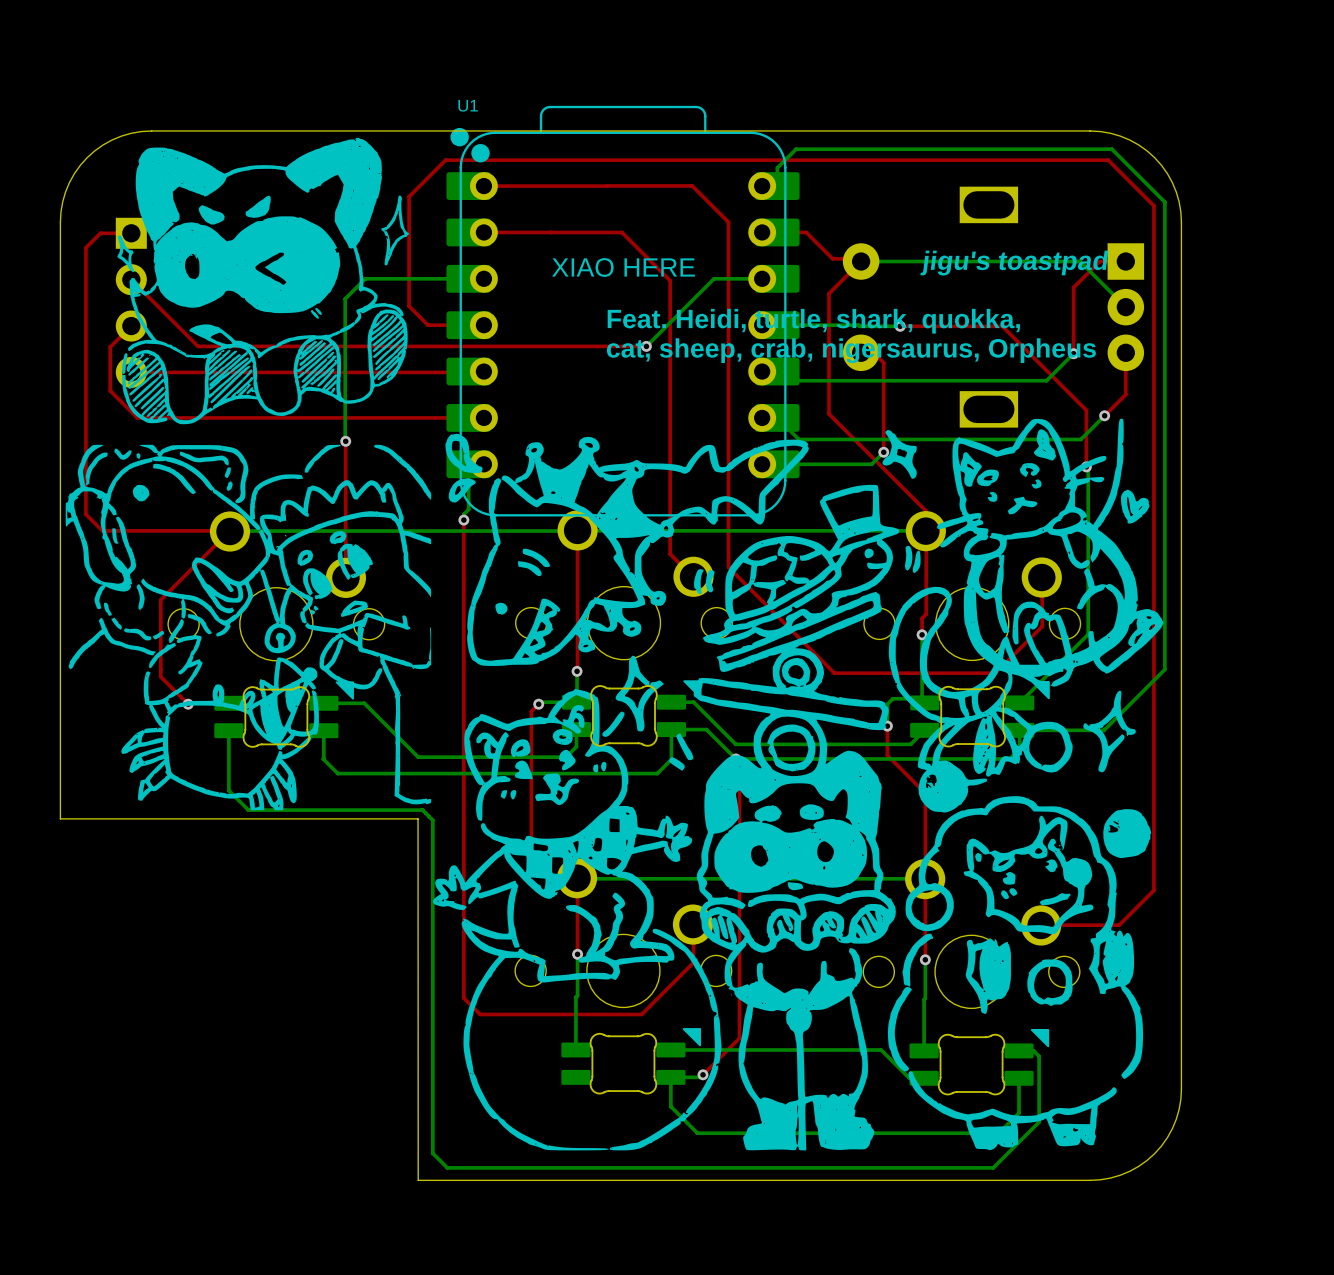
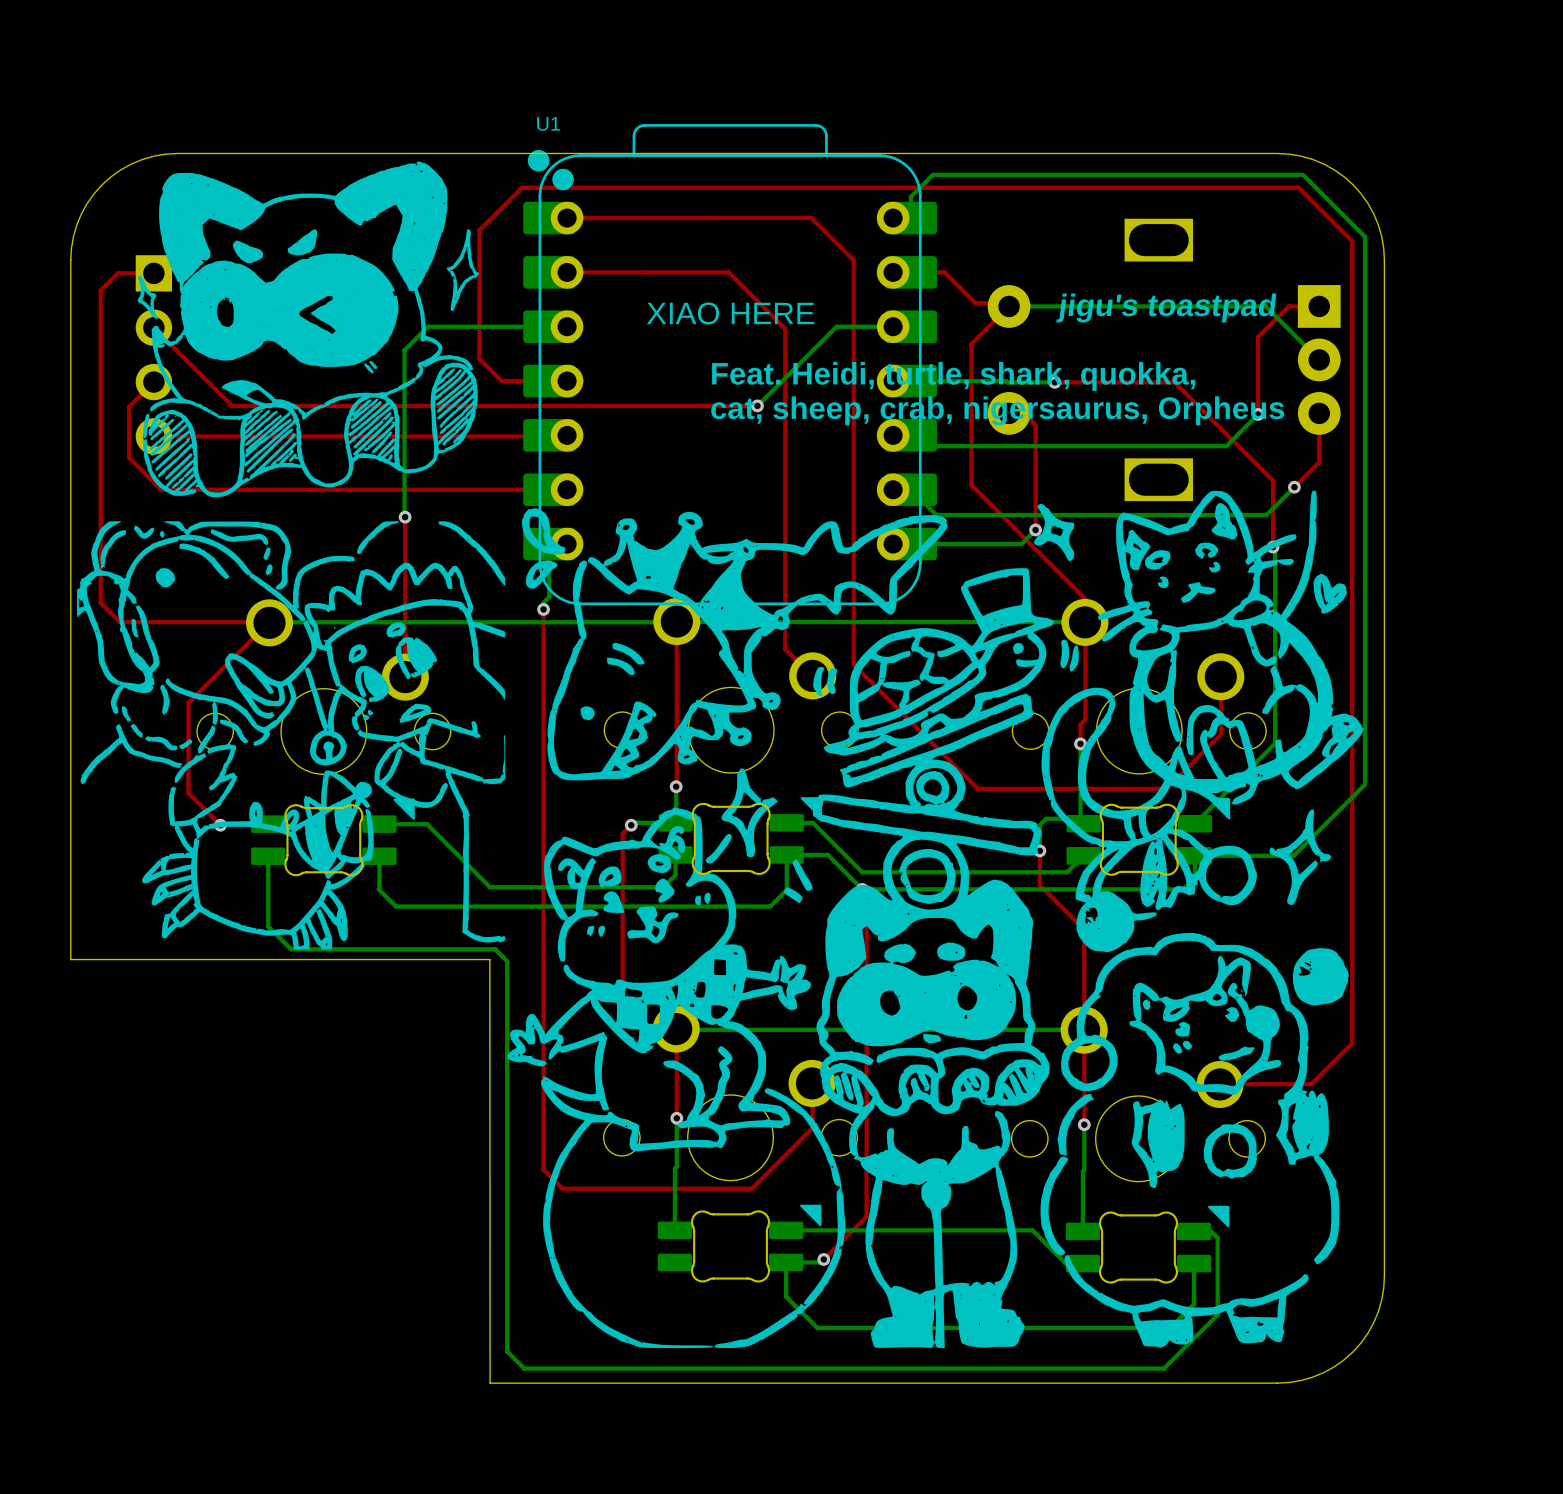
text position: jigu's toastpad (1014, 263) -> jigu's toastpad (1166, 308)

